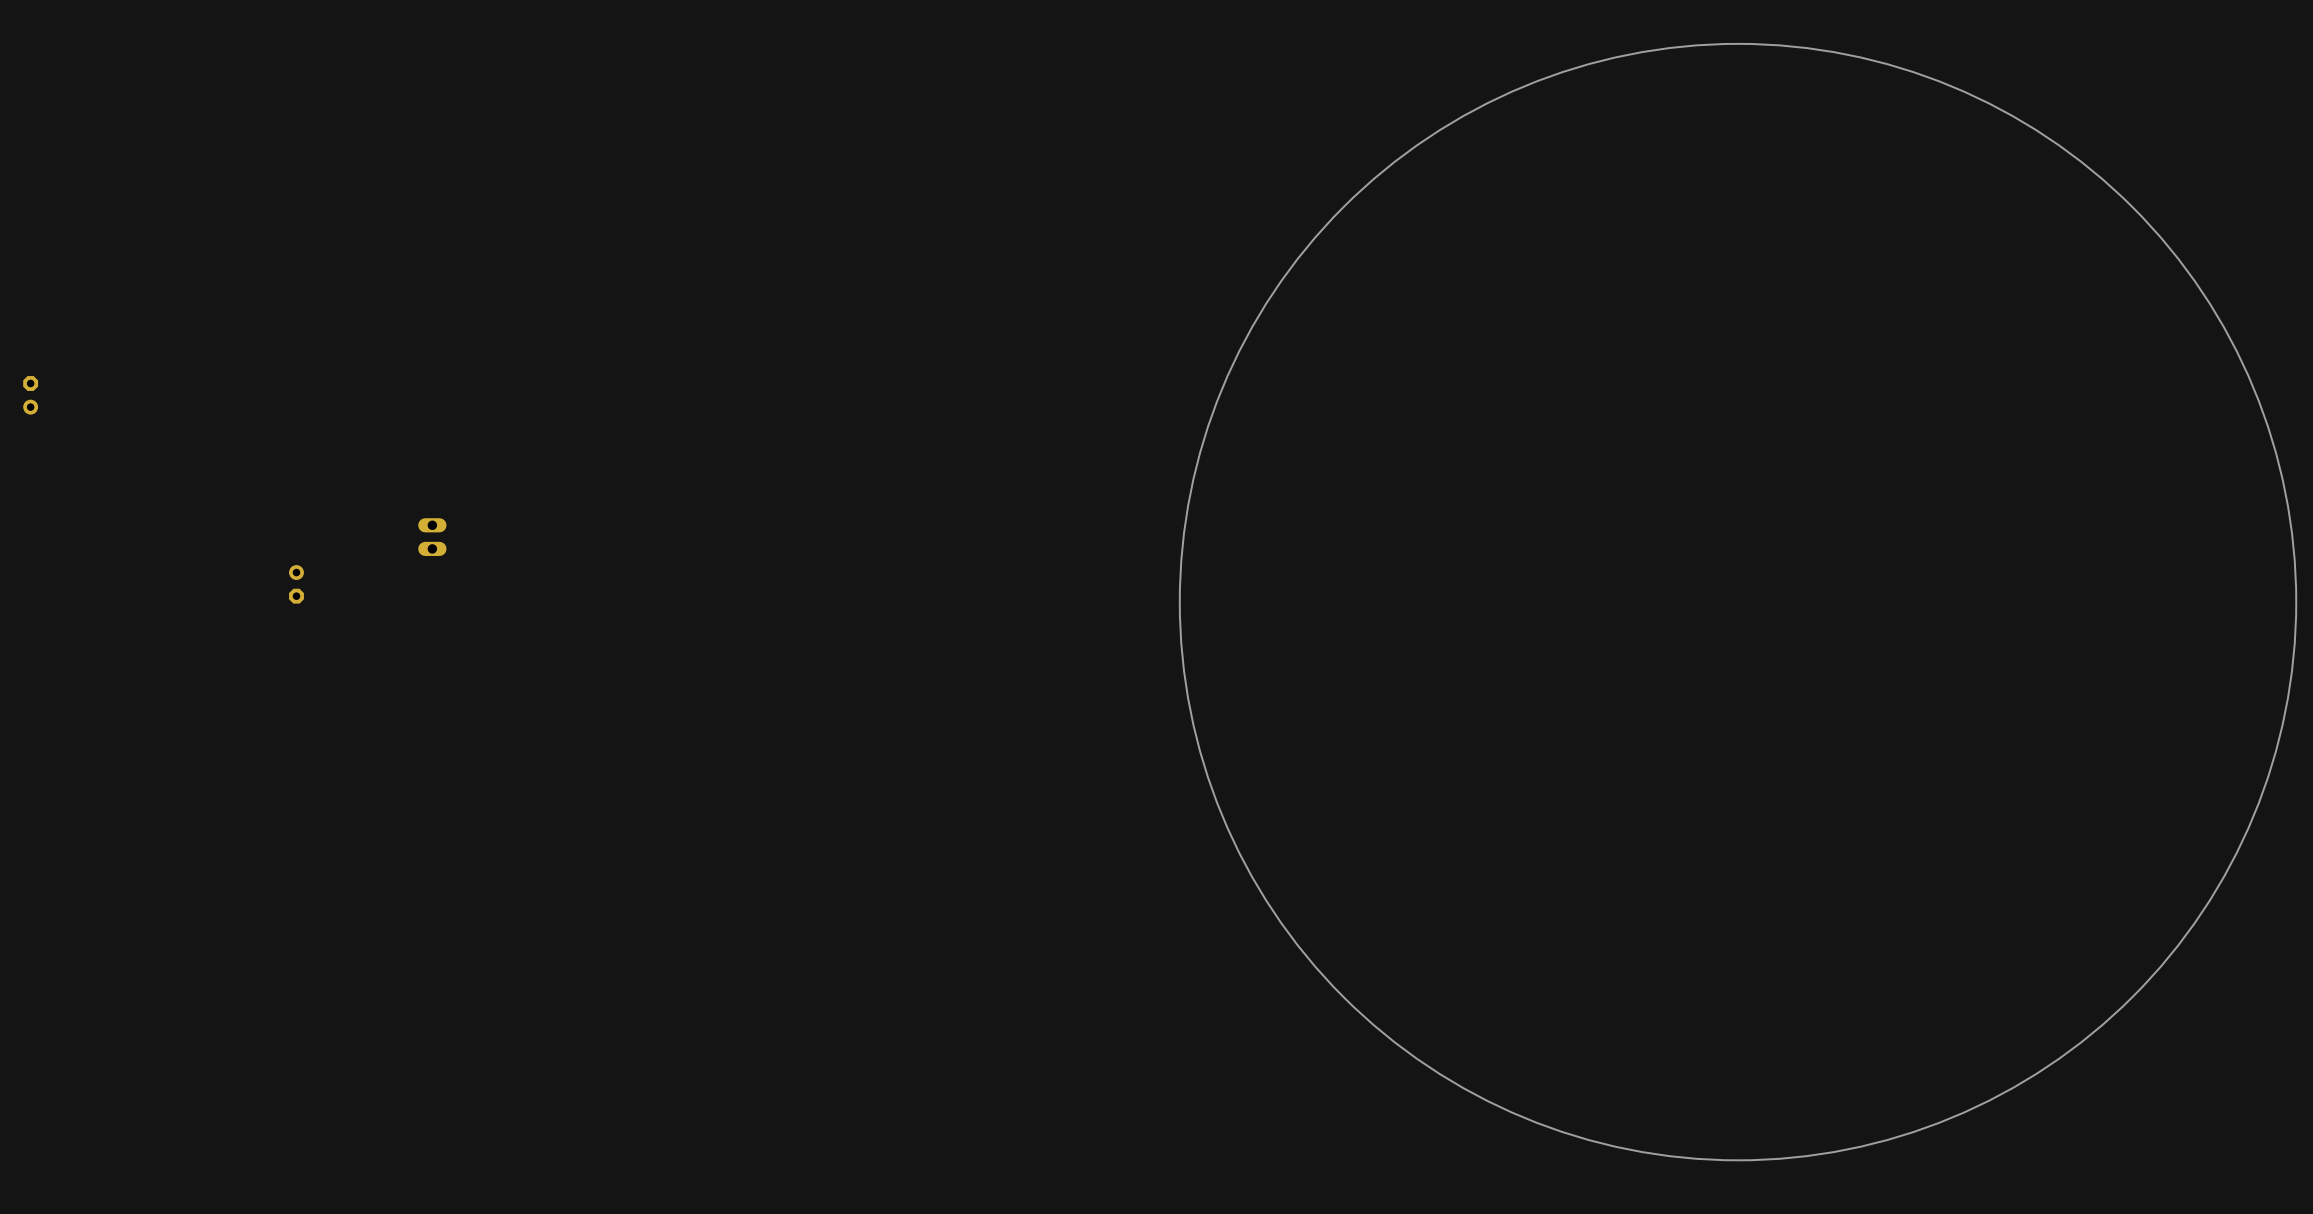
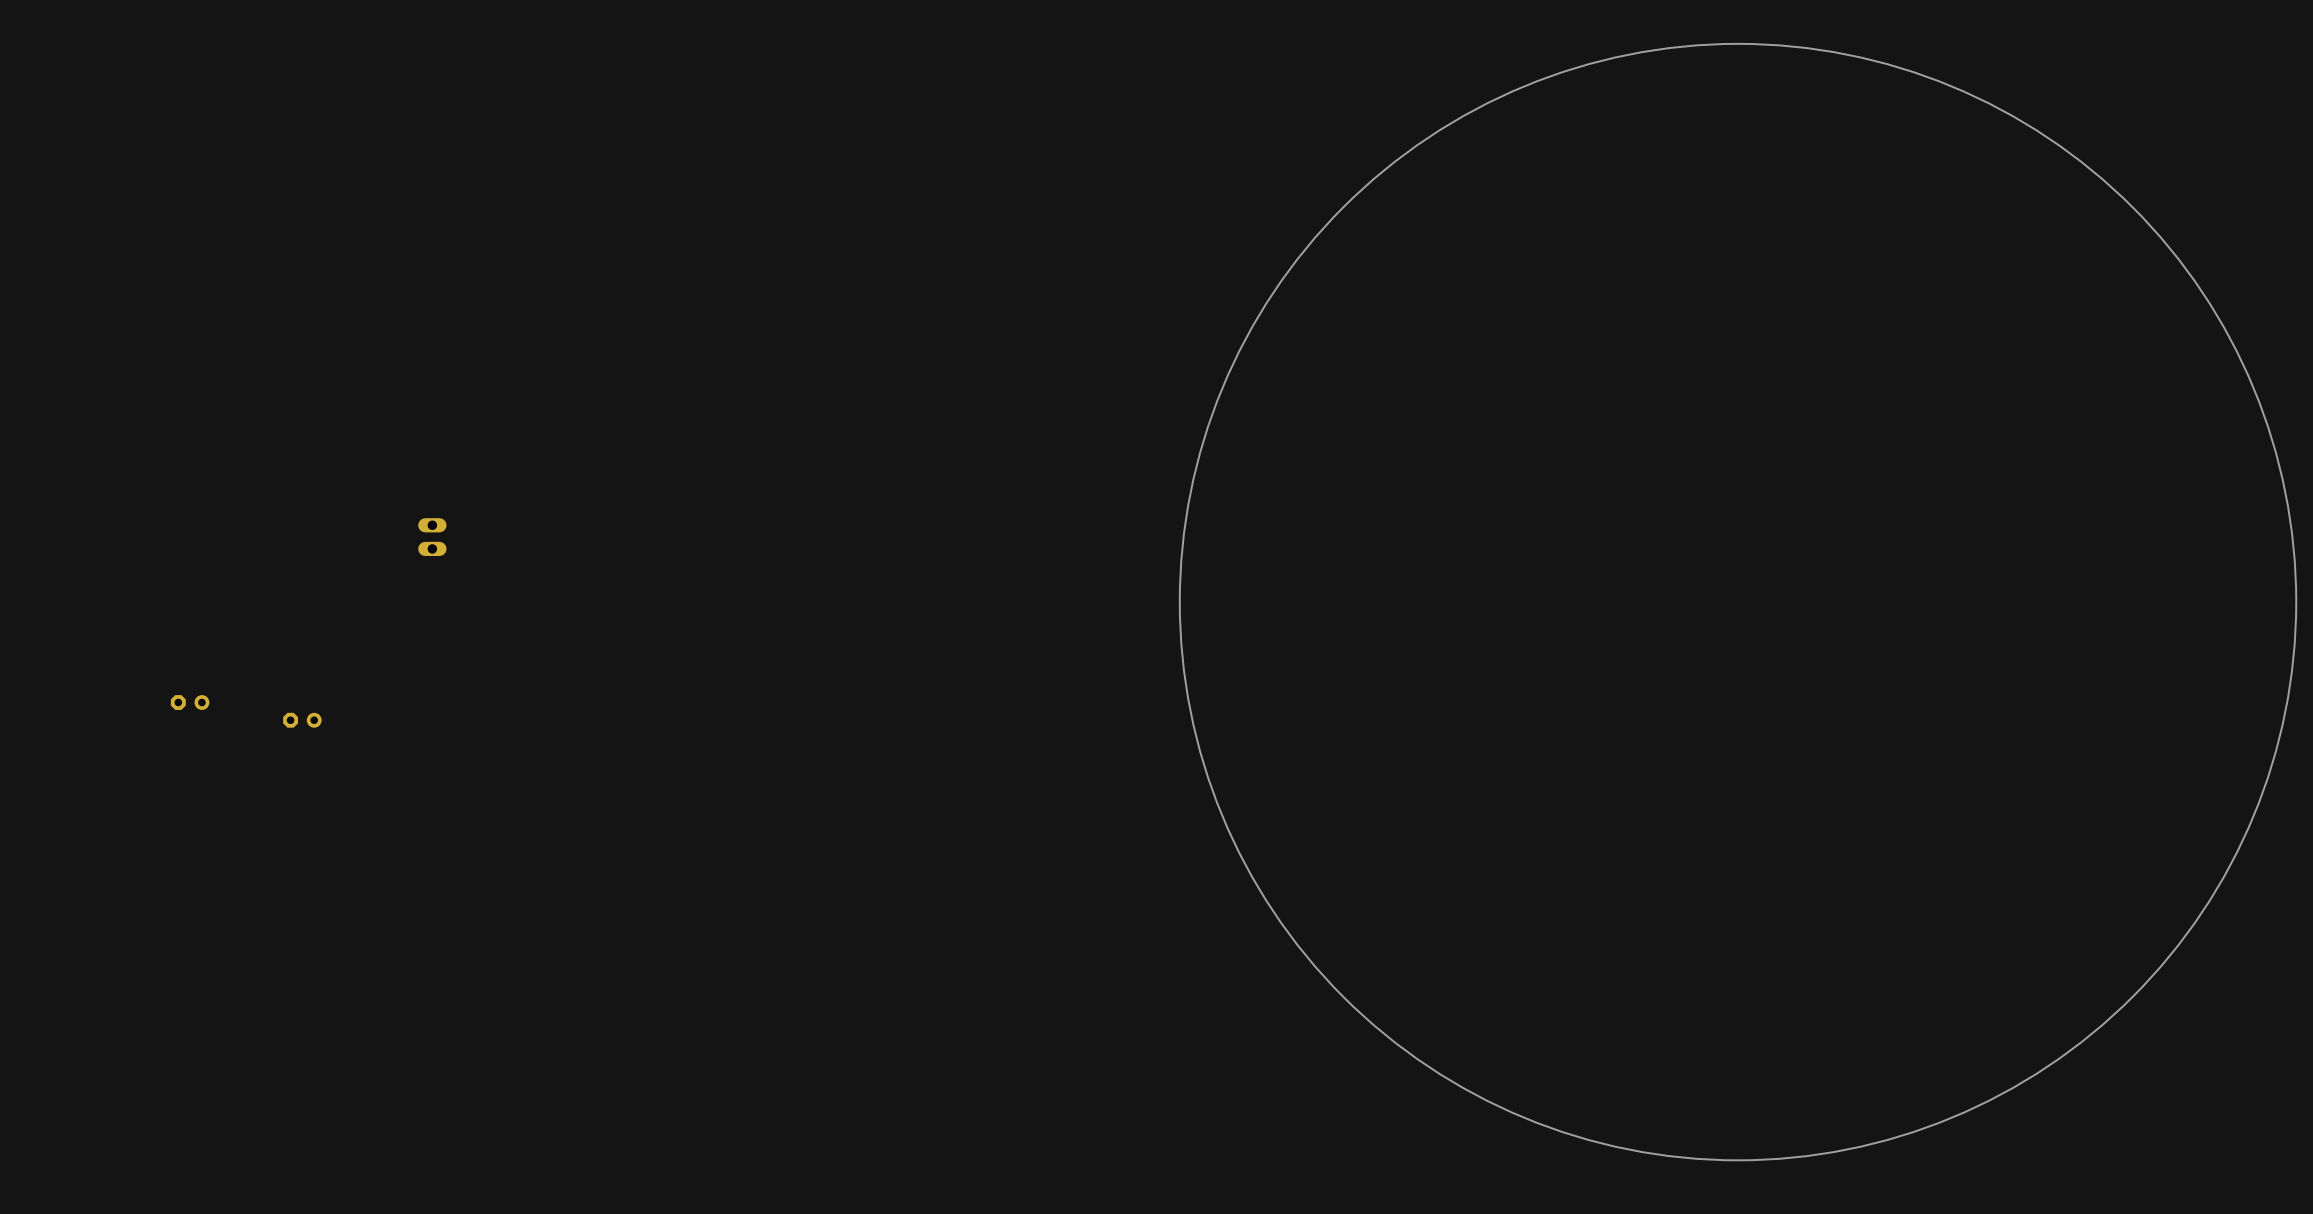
part: (30, 395) -> none
part: (296, 584) -> none
part: none -> (190, 702)
part: none -> (302, 720)

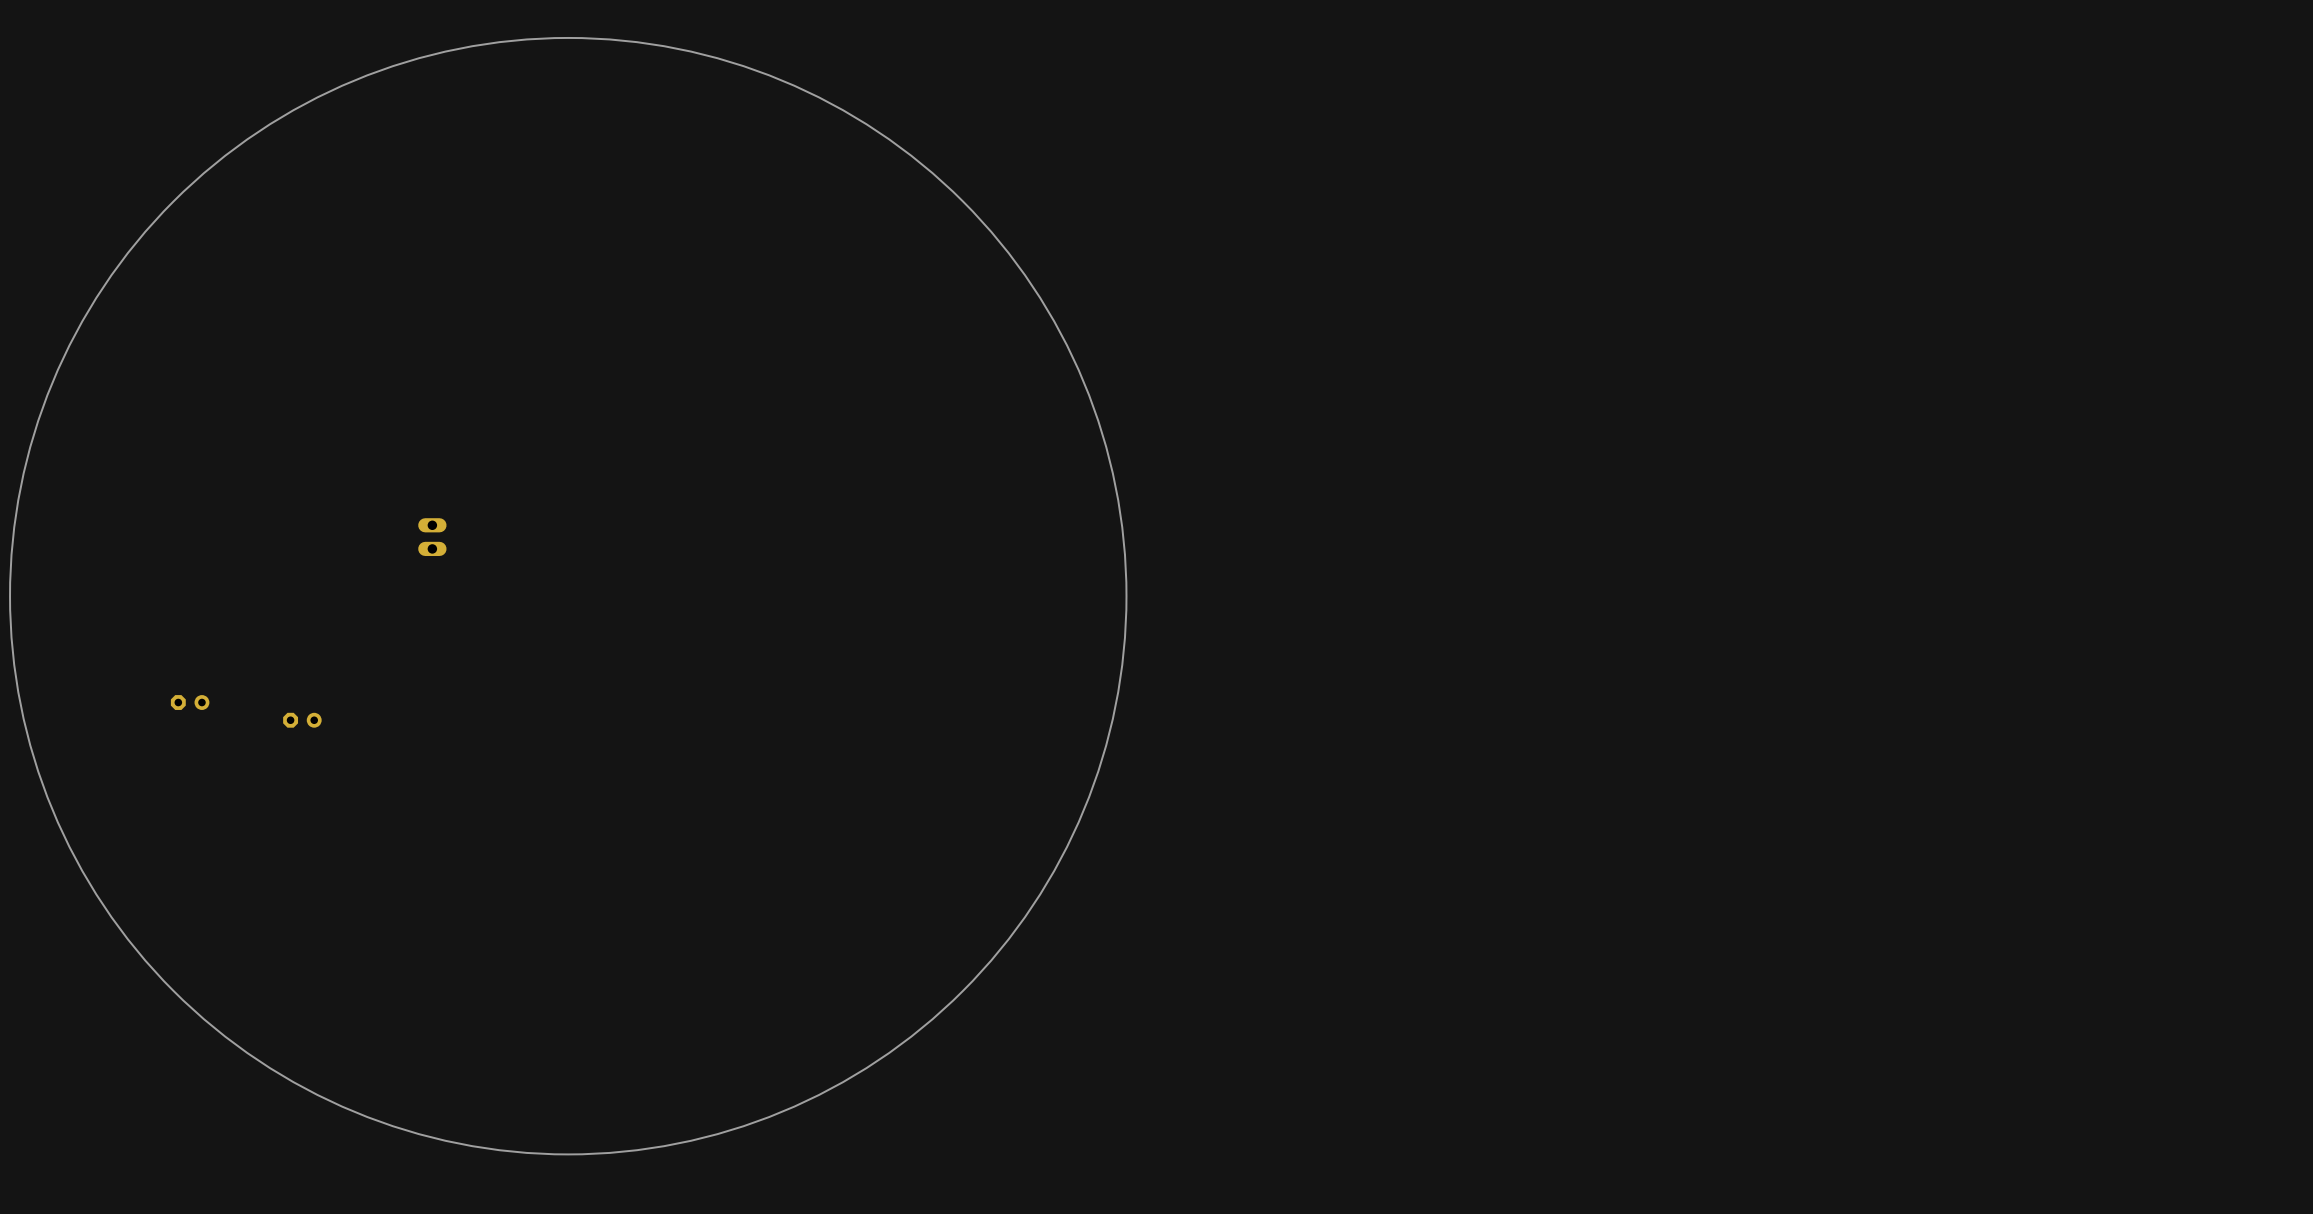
drawing: none -> [9, 37, 1128, 1156]
drawing: [1179, 43, 2297, 1161] -> none

